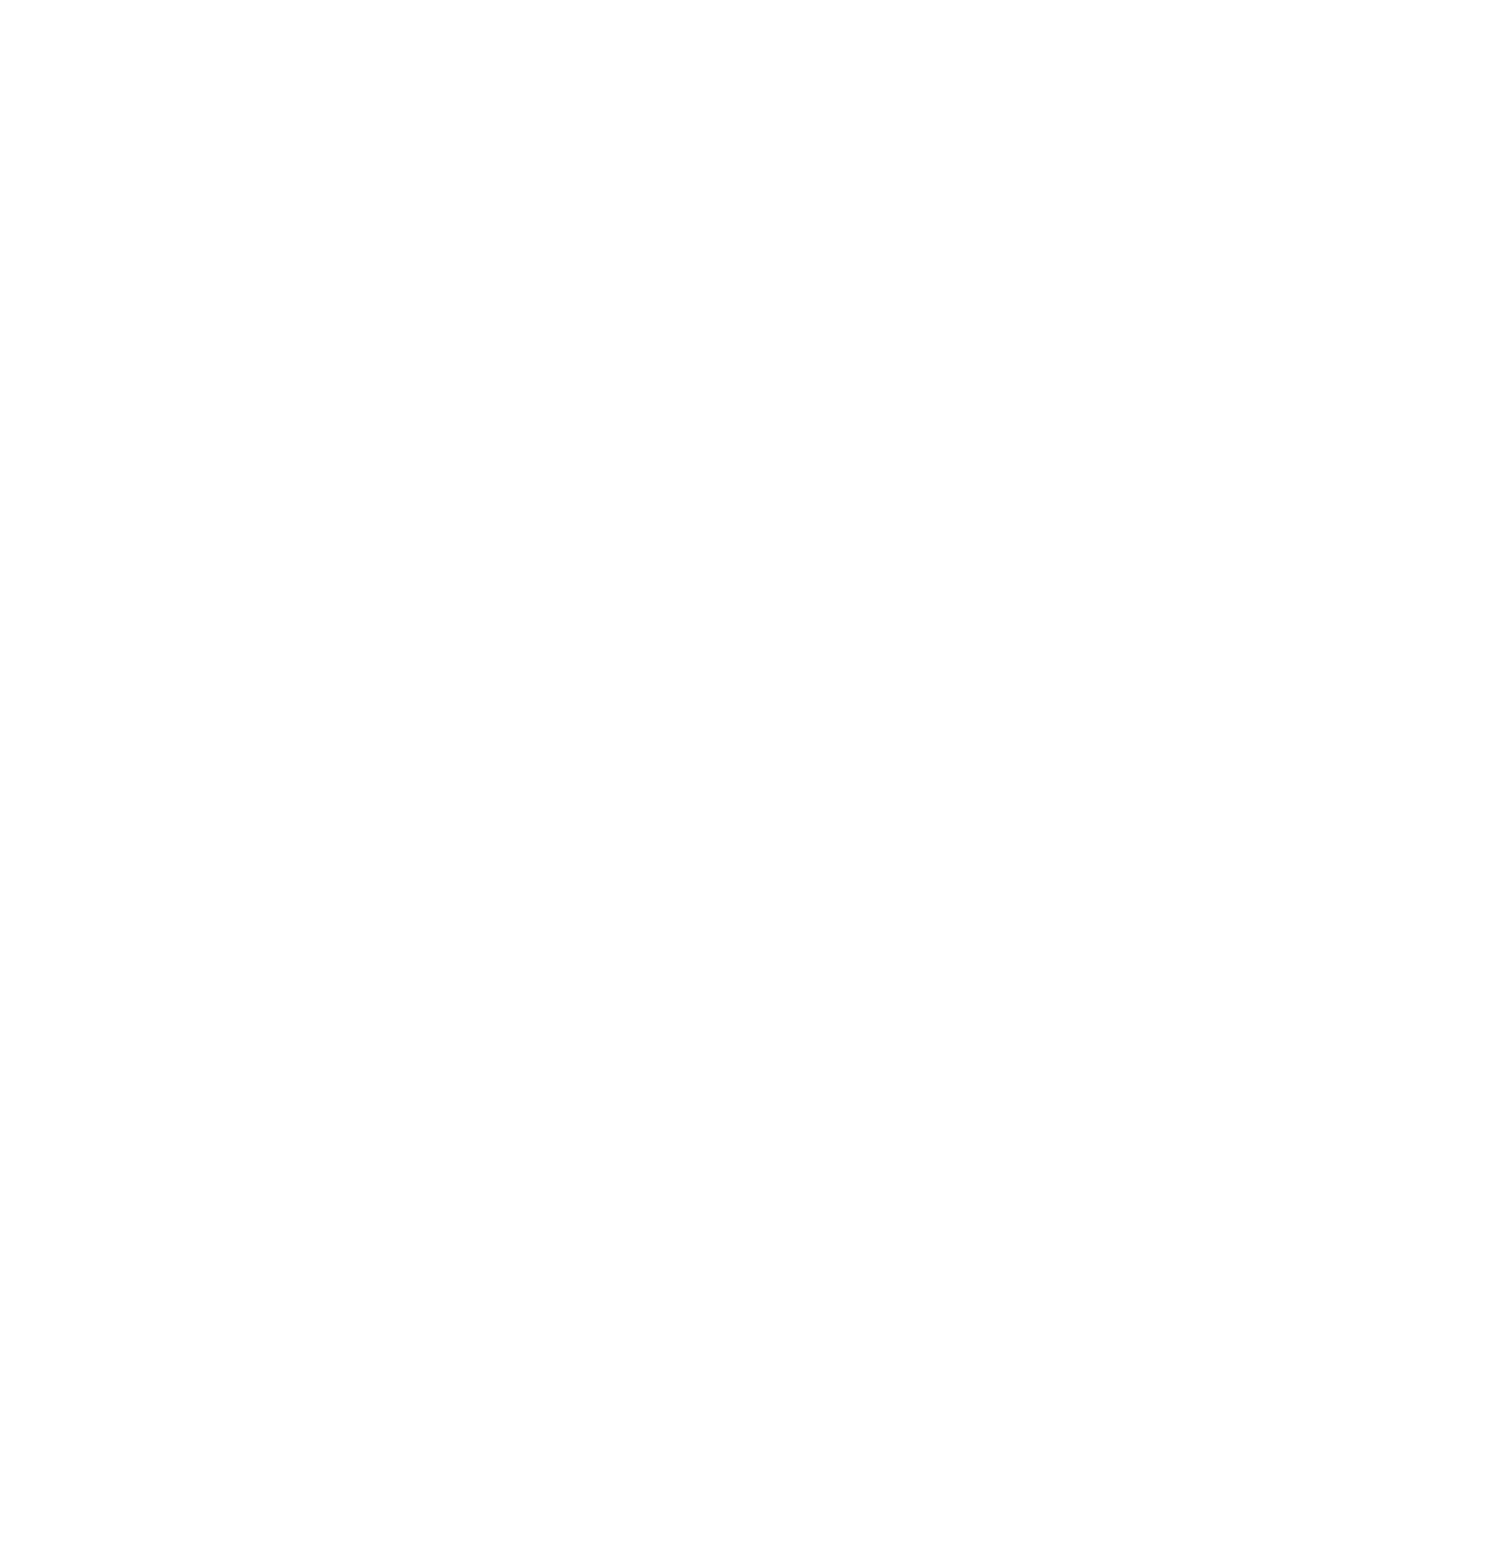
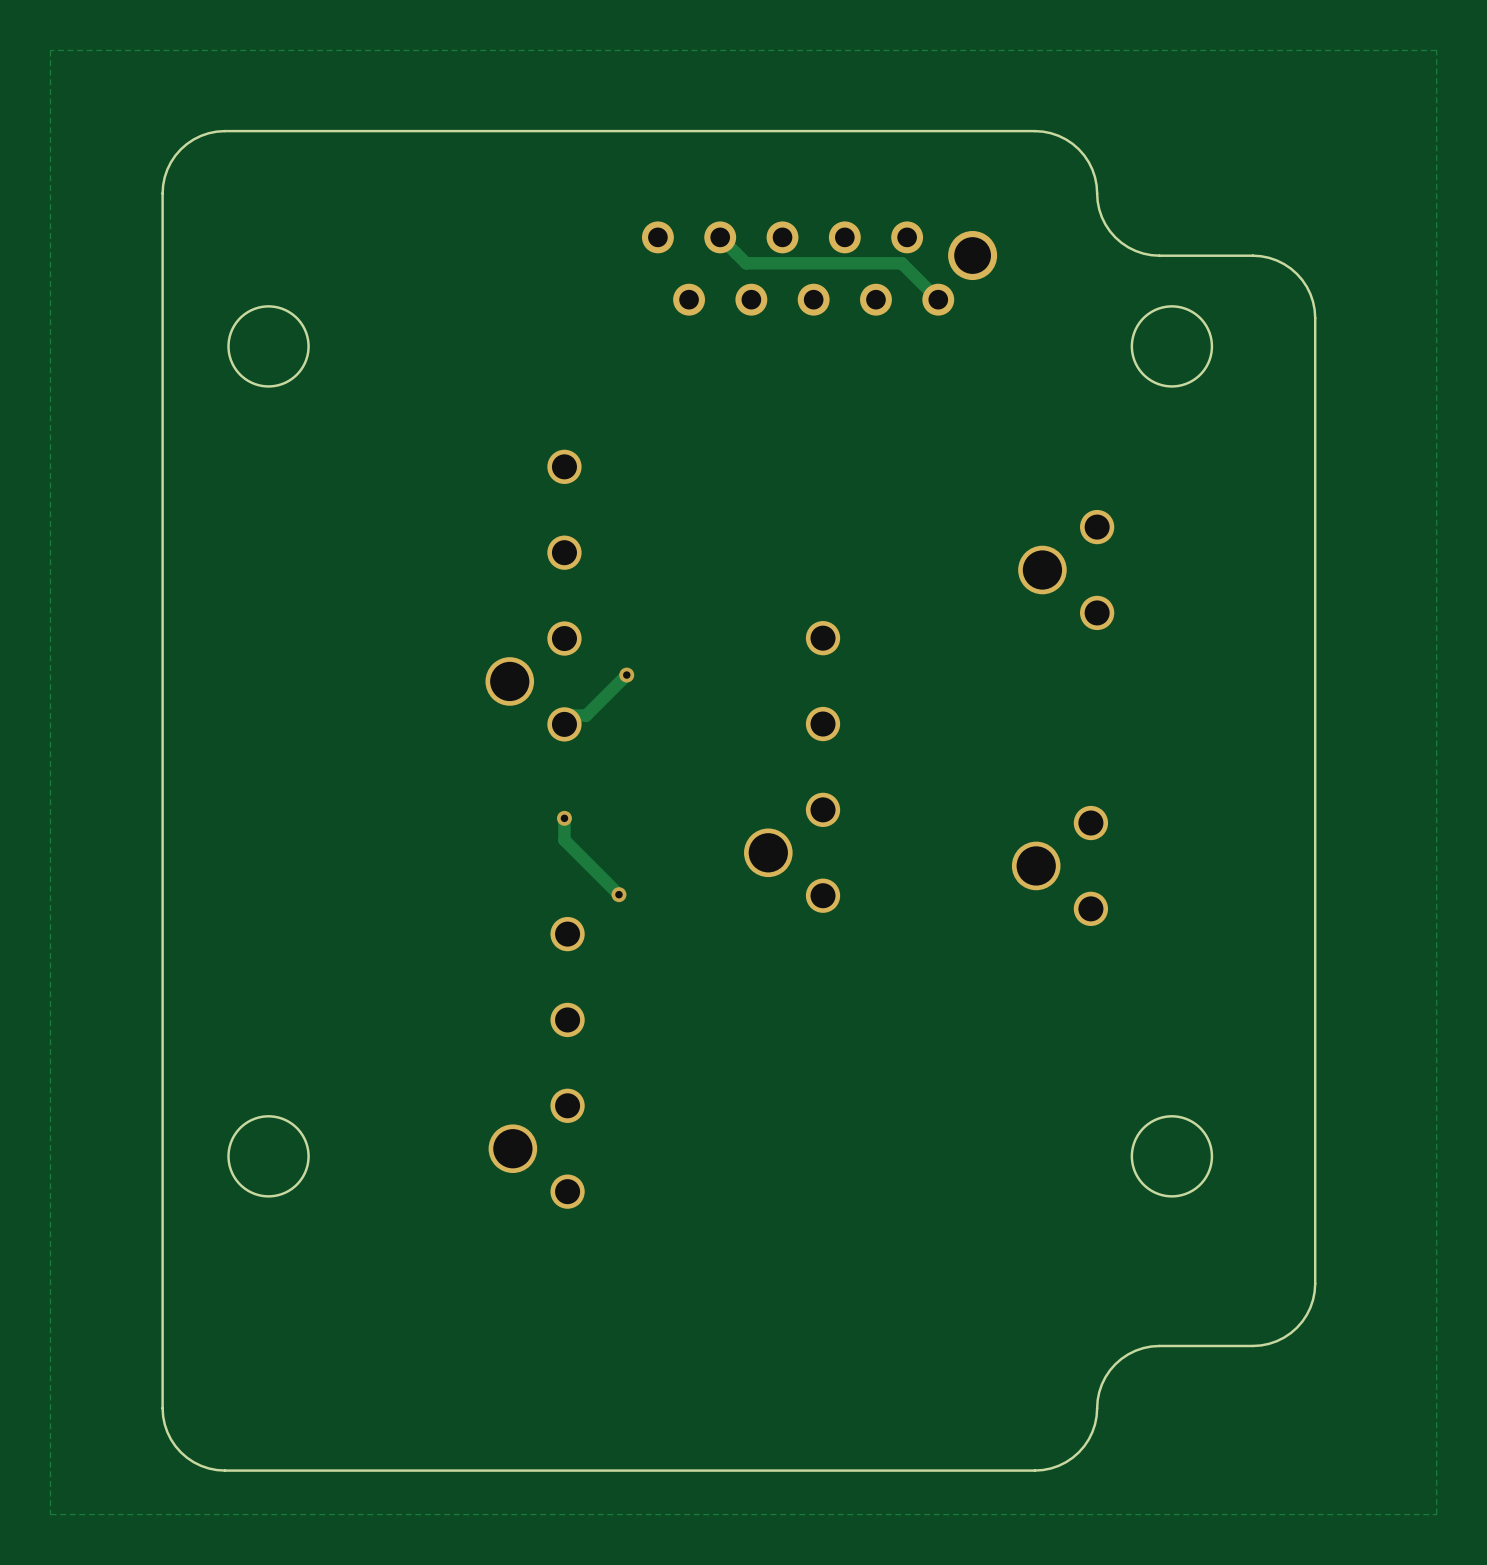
zone outline: none -> (1436, 50) (50, 50) (50, 1514) (1436, 1514) (1436, 50)
board edge: none -> (1034, 131) (224, 131) (208, 133) (193, 139) (180, 149) (170, 162) (164, 177) (162, 193) (162, 1408) (164, 1424) (170, 1439) (180, 1452) (193, 1462) (208, 1468) (224, 1470) (1042, 1470) (1065, 1462) (1084, 1446) (1095, 1424) (1101, 1384) (1110, 1370) (1128, 1354) (1151, 1346) (1252, 1345) (1269, 1343) (1290, 1333) (1306, 1314) (1313, 1299) (1315, 1283) (1315, 318) (1313, 301) (1306, 286) (1296, 273) (1284, 264) (1269, 257) (1252, 255) (1151, 255) (1128, 247) (1110, 231) (1101, 217) (1095, 177) (1084, 155) (1072, 143) (1058, 135) (1034, 131)
track: none -> (720, 237) (746, 263) (901, 263) (938, 299)
part: none -> (819, 268)
round board edge: none -> [227, 305, 310, 388]
round board edge: none -> [1130, 305, 1214, 388]
part: none -> (1066, 570)
part: none -> (533, 595)
track: none -> (626, 675) (586, 715) (573, 715) (564, 724)
via: none -> (626, 675)
part: none -> (792, 766)
track: none -> (564, 818) (564, 840) (618, 894)
via: none -> (564, 818)
part: none -> (1059, 865)
via: none -> (618, 894)
part: none -> (536, 1062)
round board edge: none -> [227, 1115, 310, 1198]
round board edge: none -> [1130, 1115, 1214, 1198]

